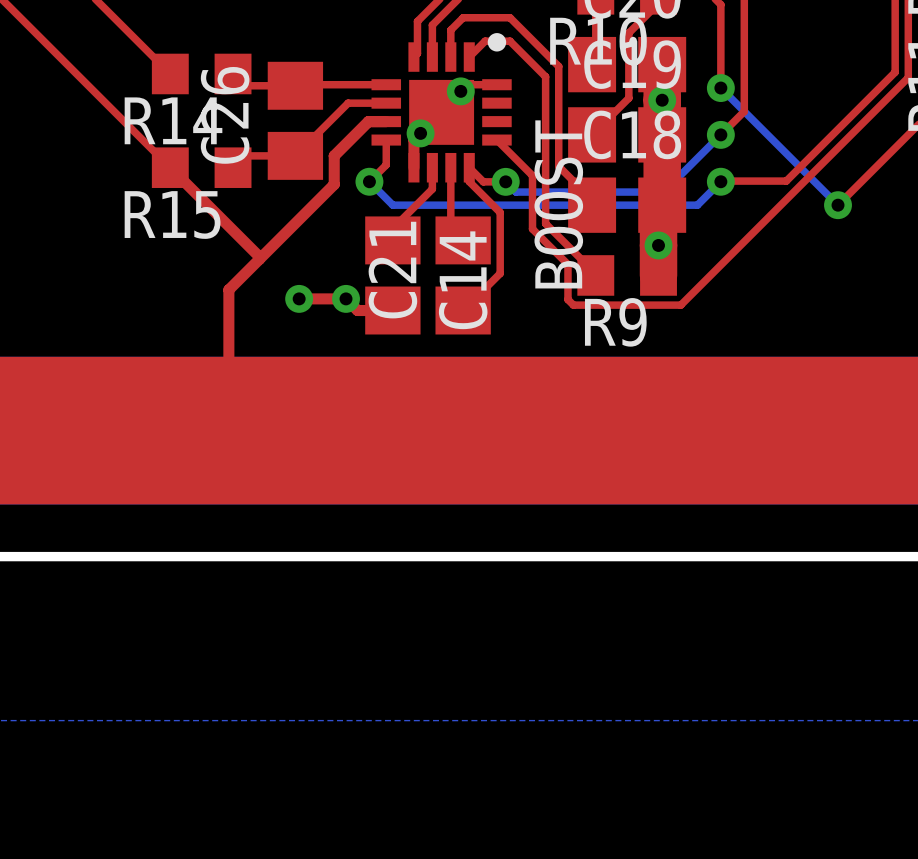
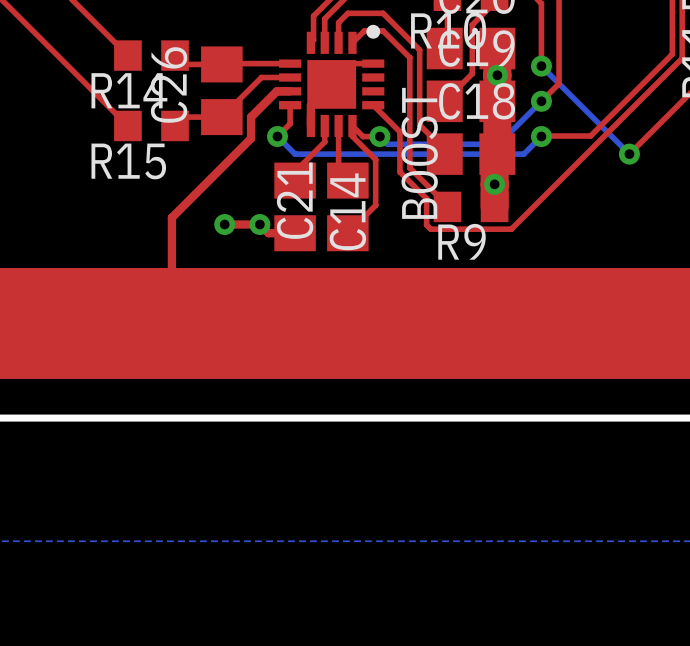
via: (460, 91) -> none
via: (420, 133) -> none
top track: (170, 167) (259, 256) (259, 259) -> none

